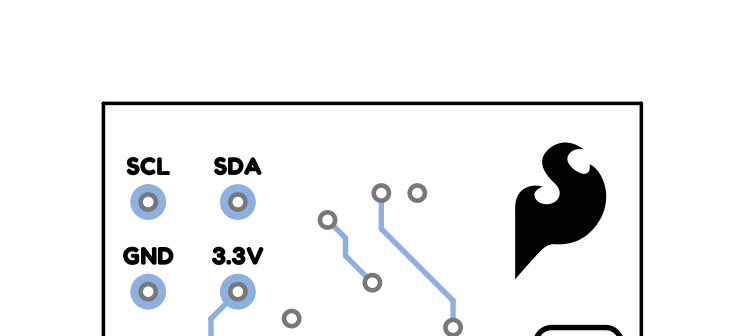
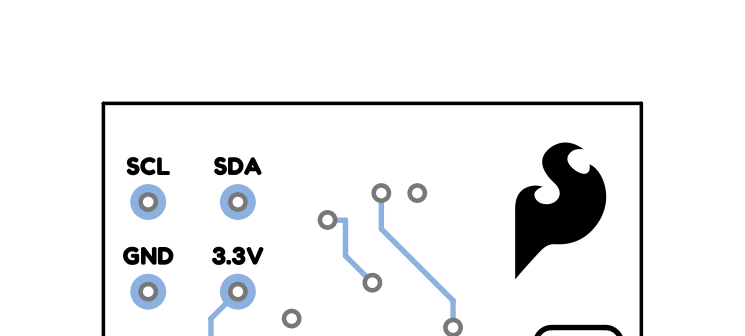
track: (327, 219) (345, 237) -> (327, 220) (345, 220) (345, 237)

